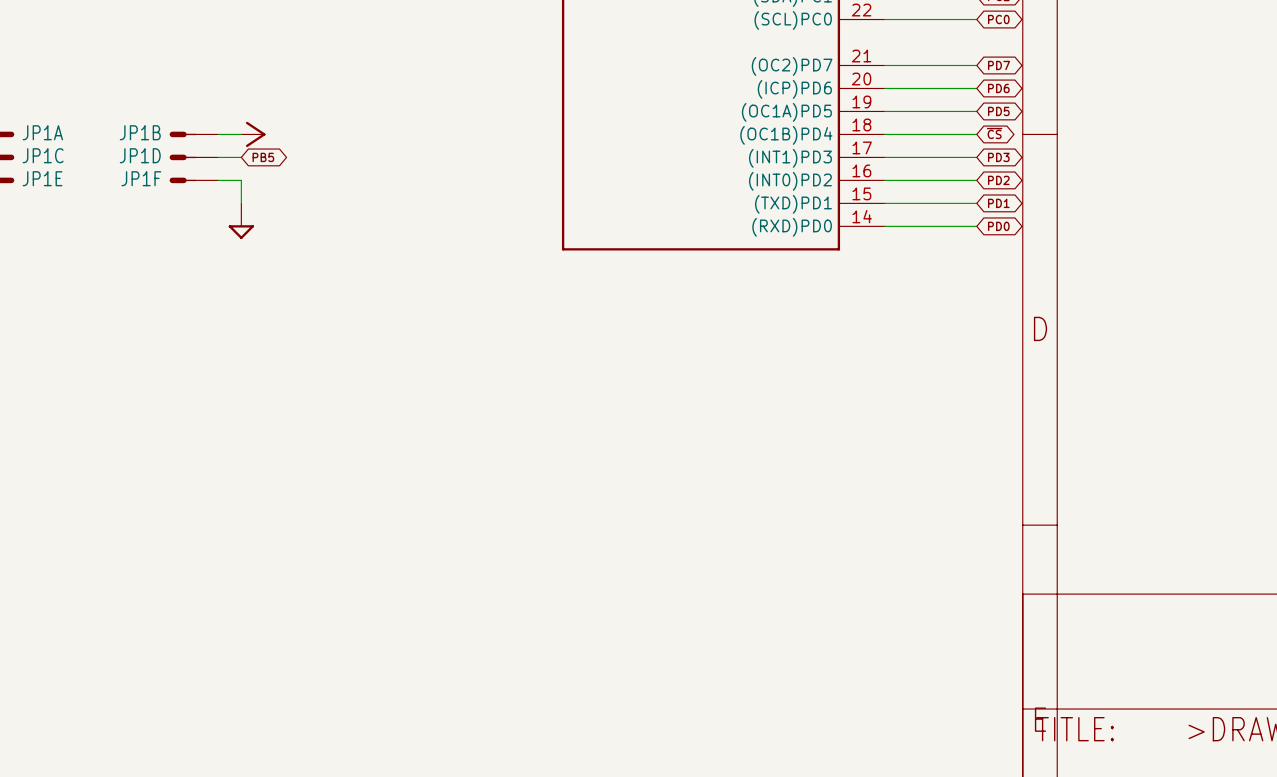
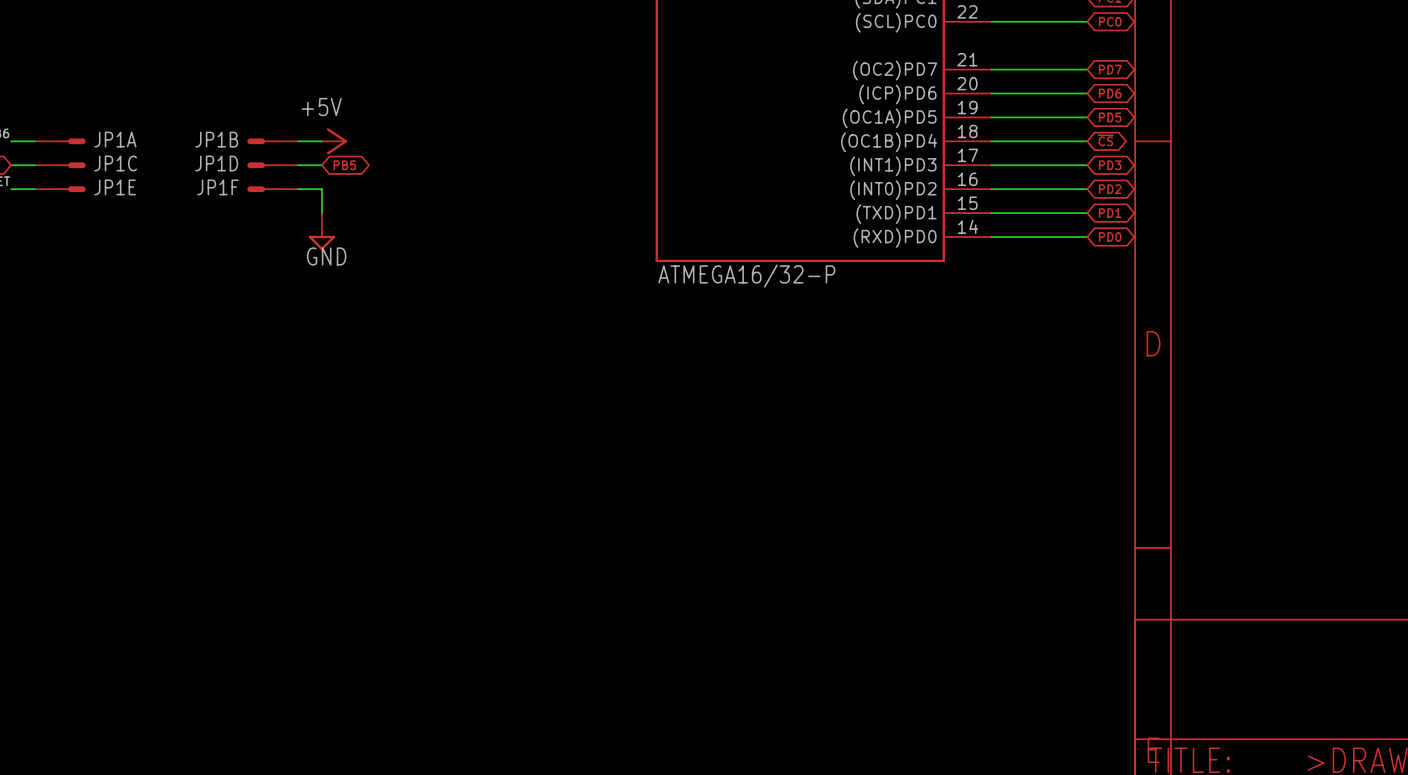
power symbol text: none -> +5V (321, 107)
power symbol text: none -> GND (326, 256)
part value: none -> ATMEGA16/32-P (746, 276)

